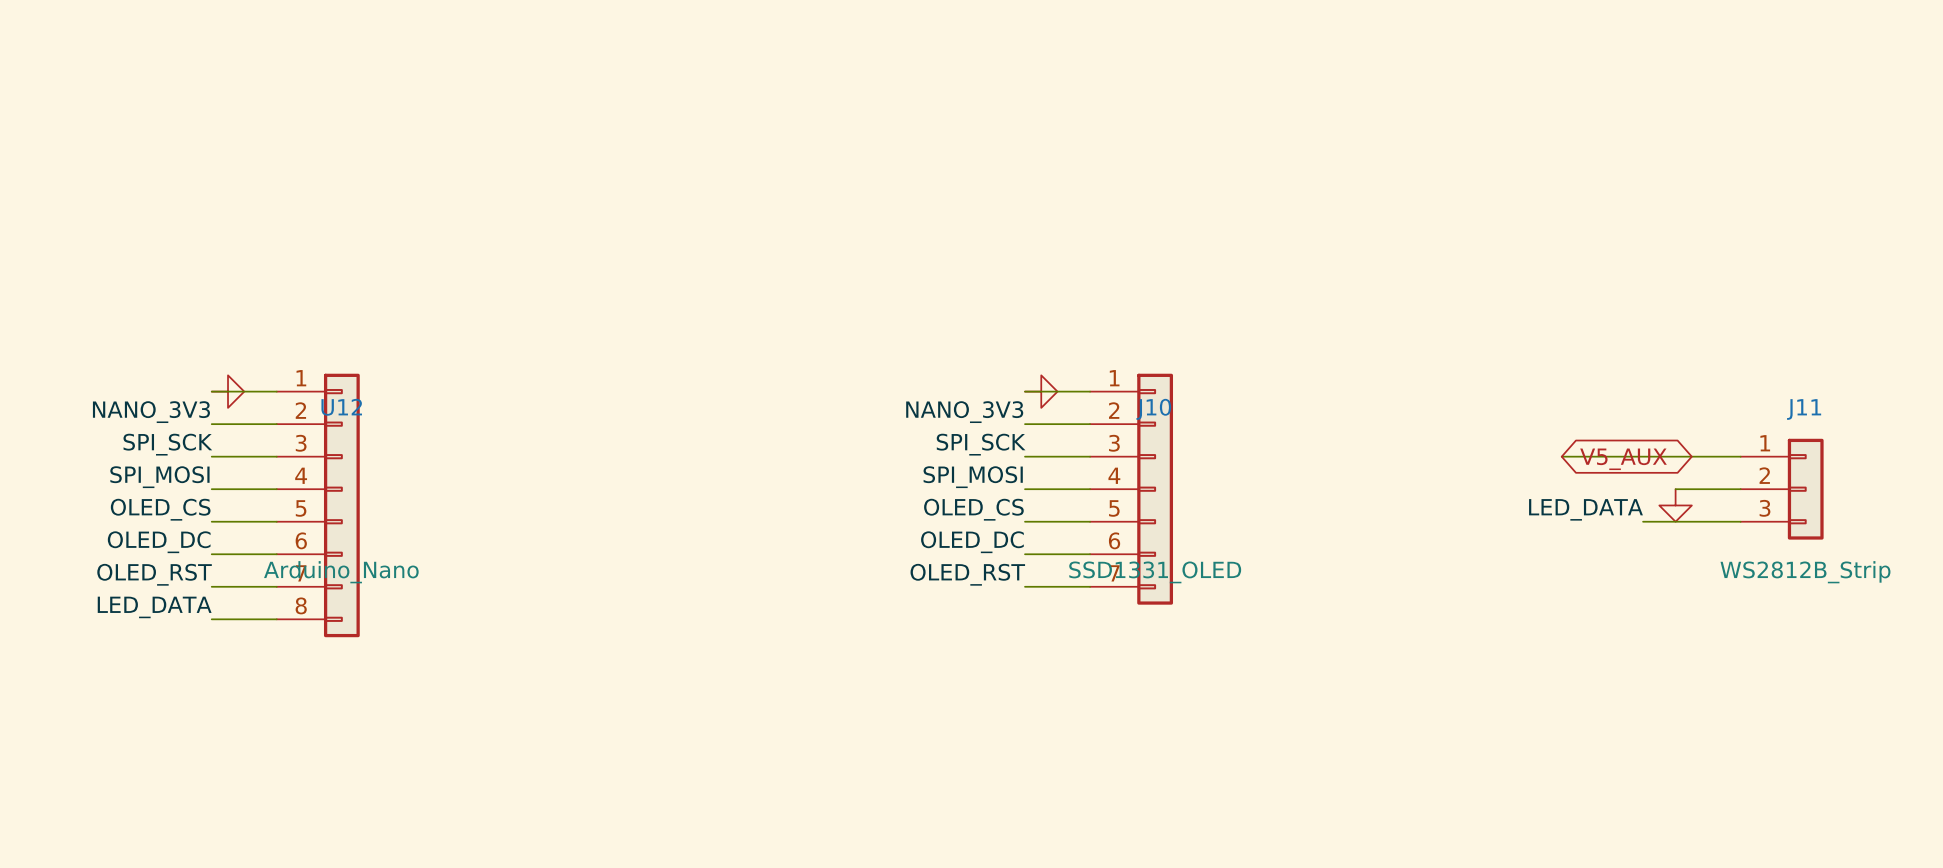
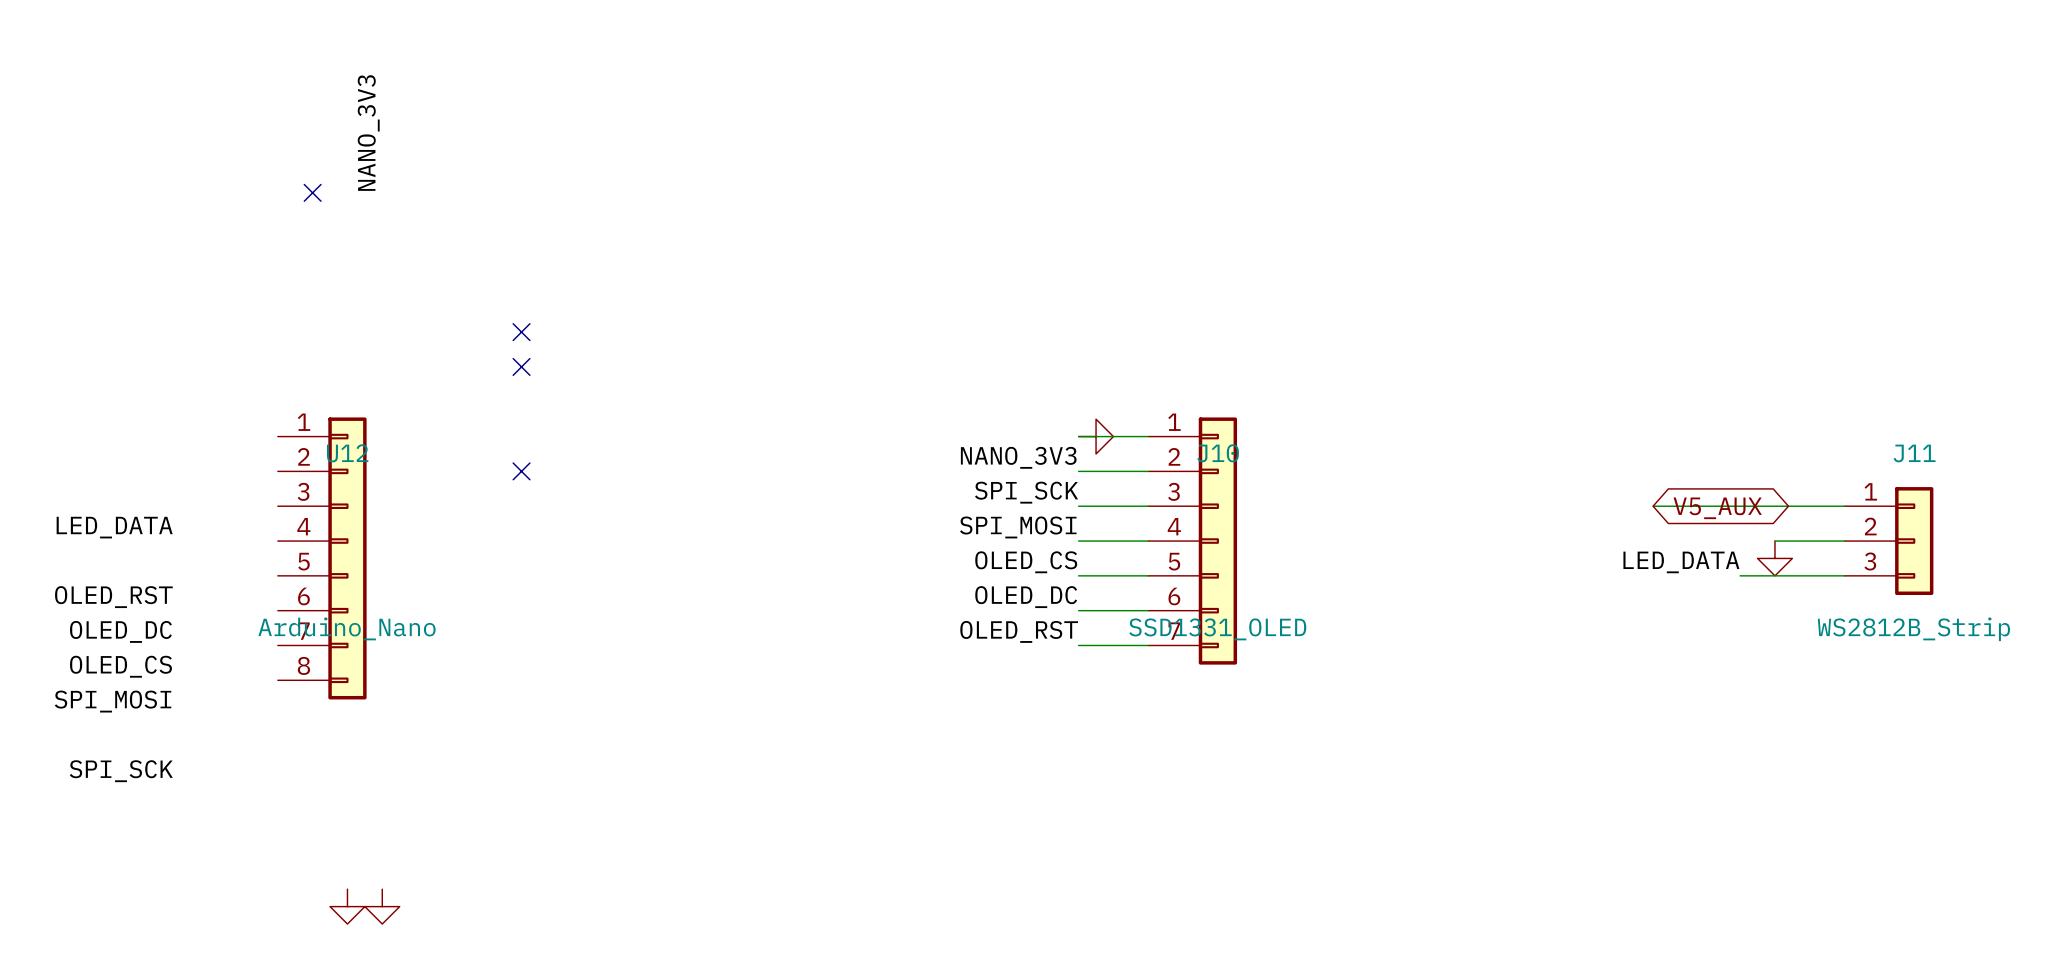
no-connect mark: none -> (312, 192)
no-connect mark: none -> (521, 332)
no-connect mark: none -> (521, 366)
wire: (211, 391) (276, 391) -> none
power symbol: (228, 391) -> none
label rotation: 0° (151, 412) -> 90° counterclockwise (368, 133)
label position: NANO_3V3 (151, 412) -> NANO_3V3 (368, 133)
wire: (211, 424) (276, 424) -> none
no-connect mark: none -> (521, 471)
label position: SPI_SCK (167, 444) -> SPI_SCK (121, 771)
wire: (211, 456) (276, 456) -> none
label position: SPI_MOSI (159, 477) -> SPI_MOSI (113, 701)
wire: (211, 489) (276, 489) -> none
label position: OLED_CS (160, 509) -> OLED_CS (120, 666)
wire: (211, 521) (276, 521) -> none
label position: OLED_DC (159, 542) -> OLED_DC (120, 631)
wire: (211, 554) (276, 554) -> none
label position: OLED_RST (154, 574) -> OLED_RST (113, 597)
wire: (211, 586) (276, 586) -> none
label position: LED_DATA (154, 607) -> LED_DATA (114, 527)
wire: (211, 619) (276, 619) -> none
power symbol: none -> (347, 906)
power symbol: none -> (382, 906)

